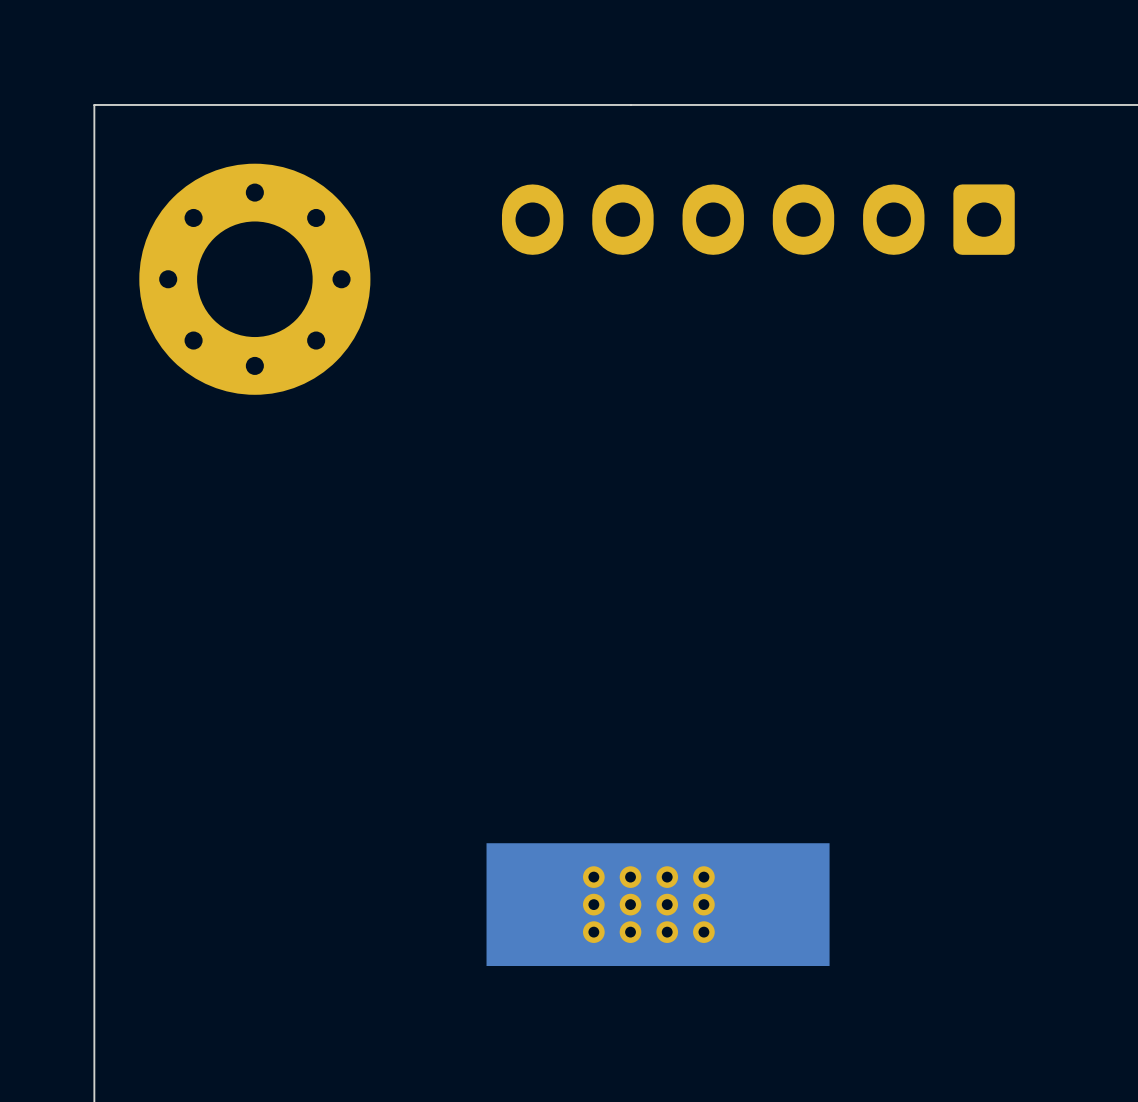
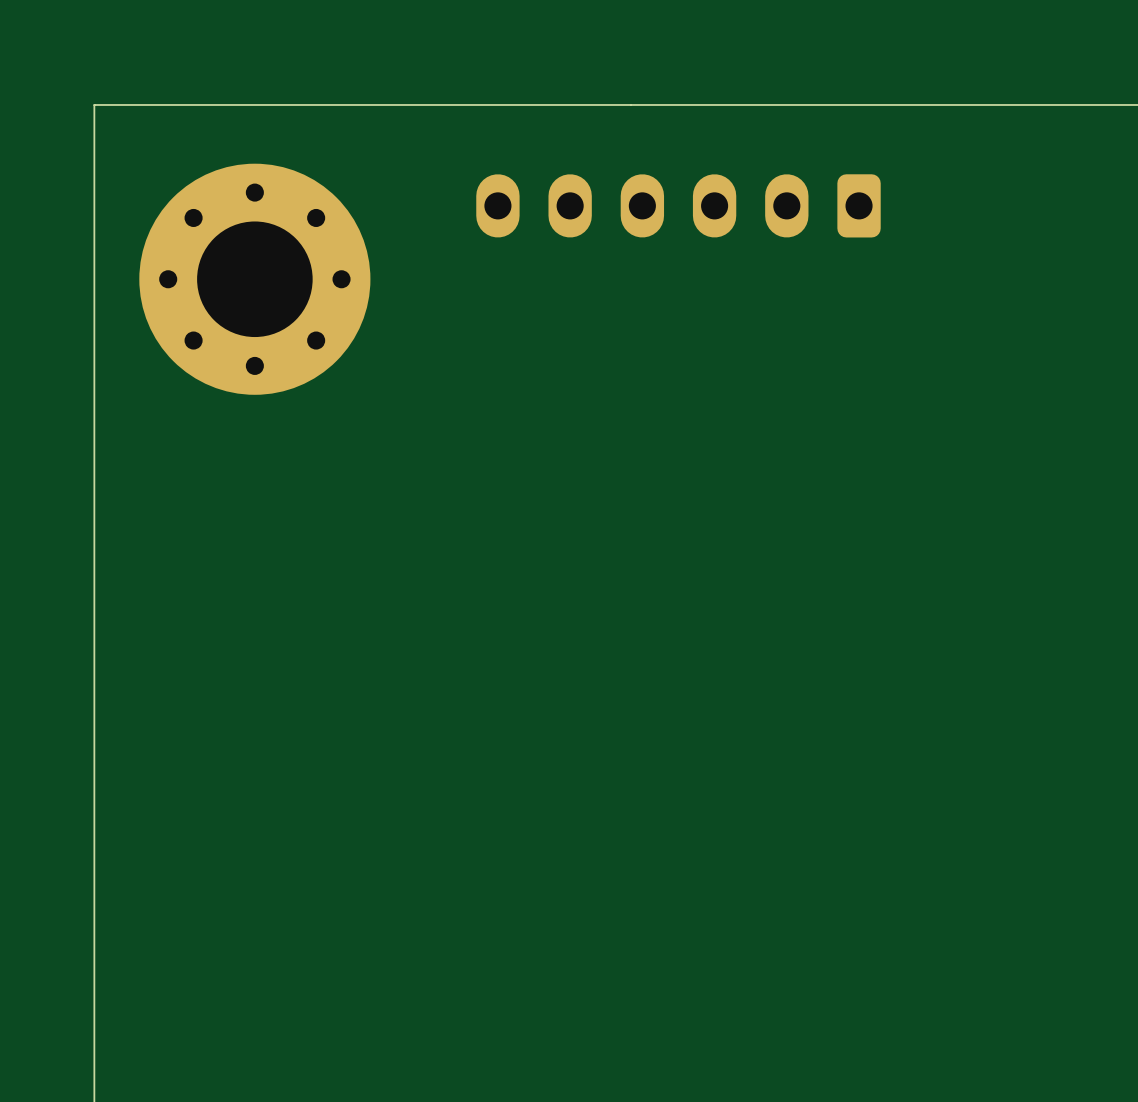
part: none -> (678, 205)
part: (758, 219) -> none
part: (658, 904) -> none

